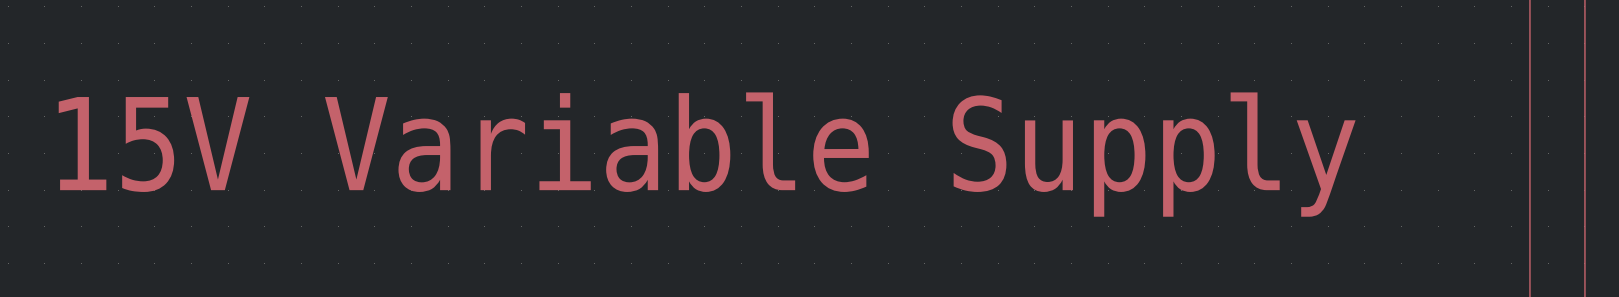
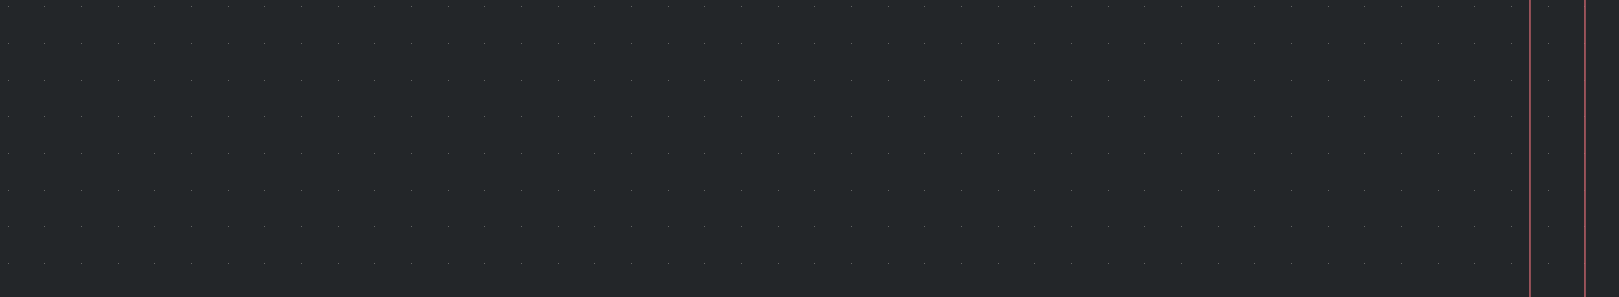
text: 15V Variable Supply (707, 154) -> none

